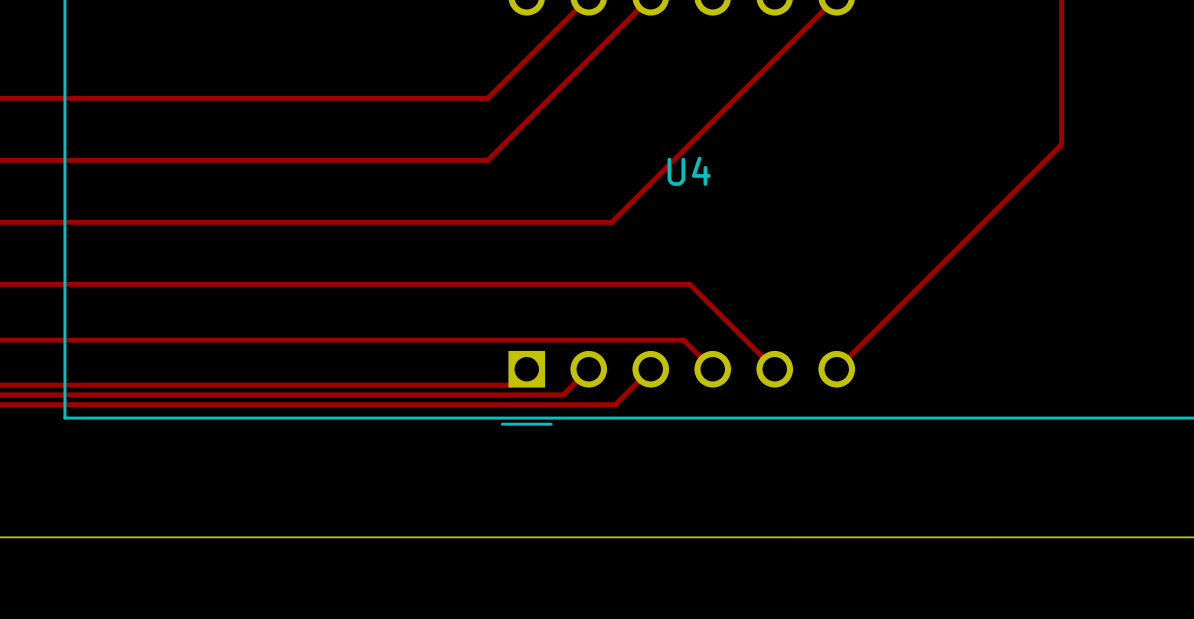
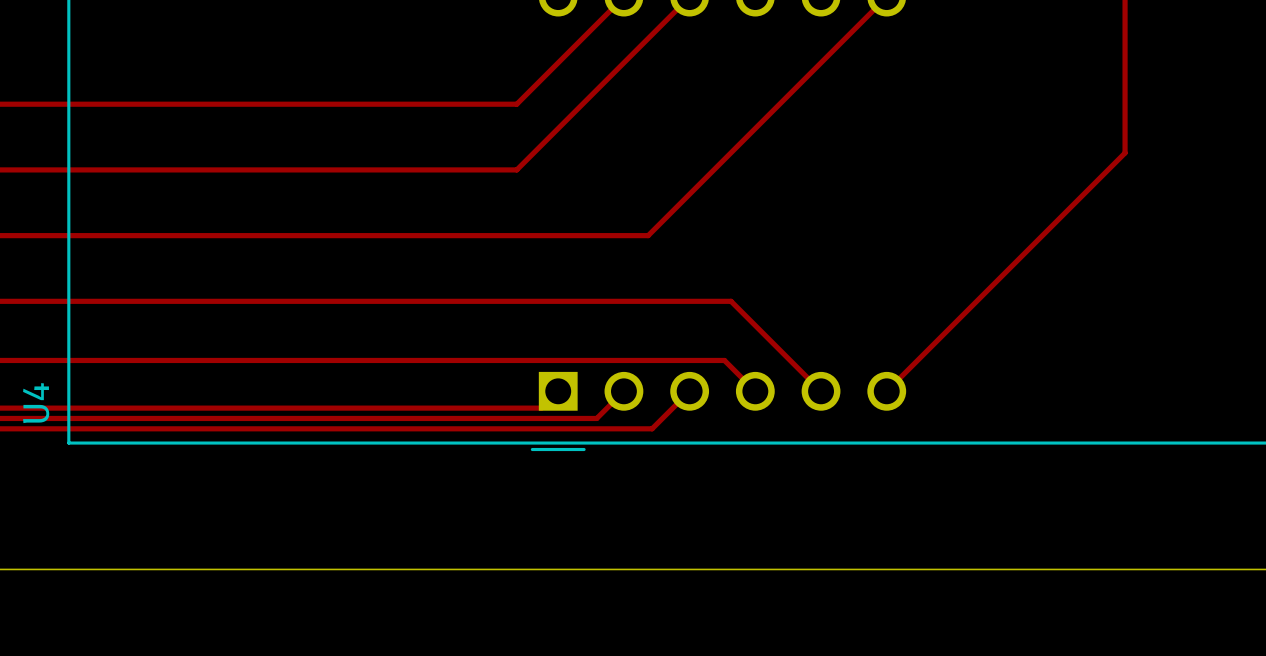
U4 name rotation: 0° (689, 171) -> 90° counterclockwise (36, 403)
U4 name position: U4 (689, 171) -> U4 (36, 403)

